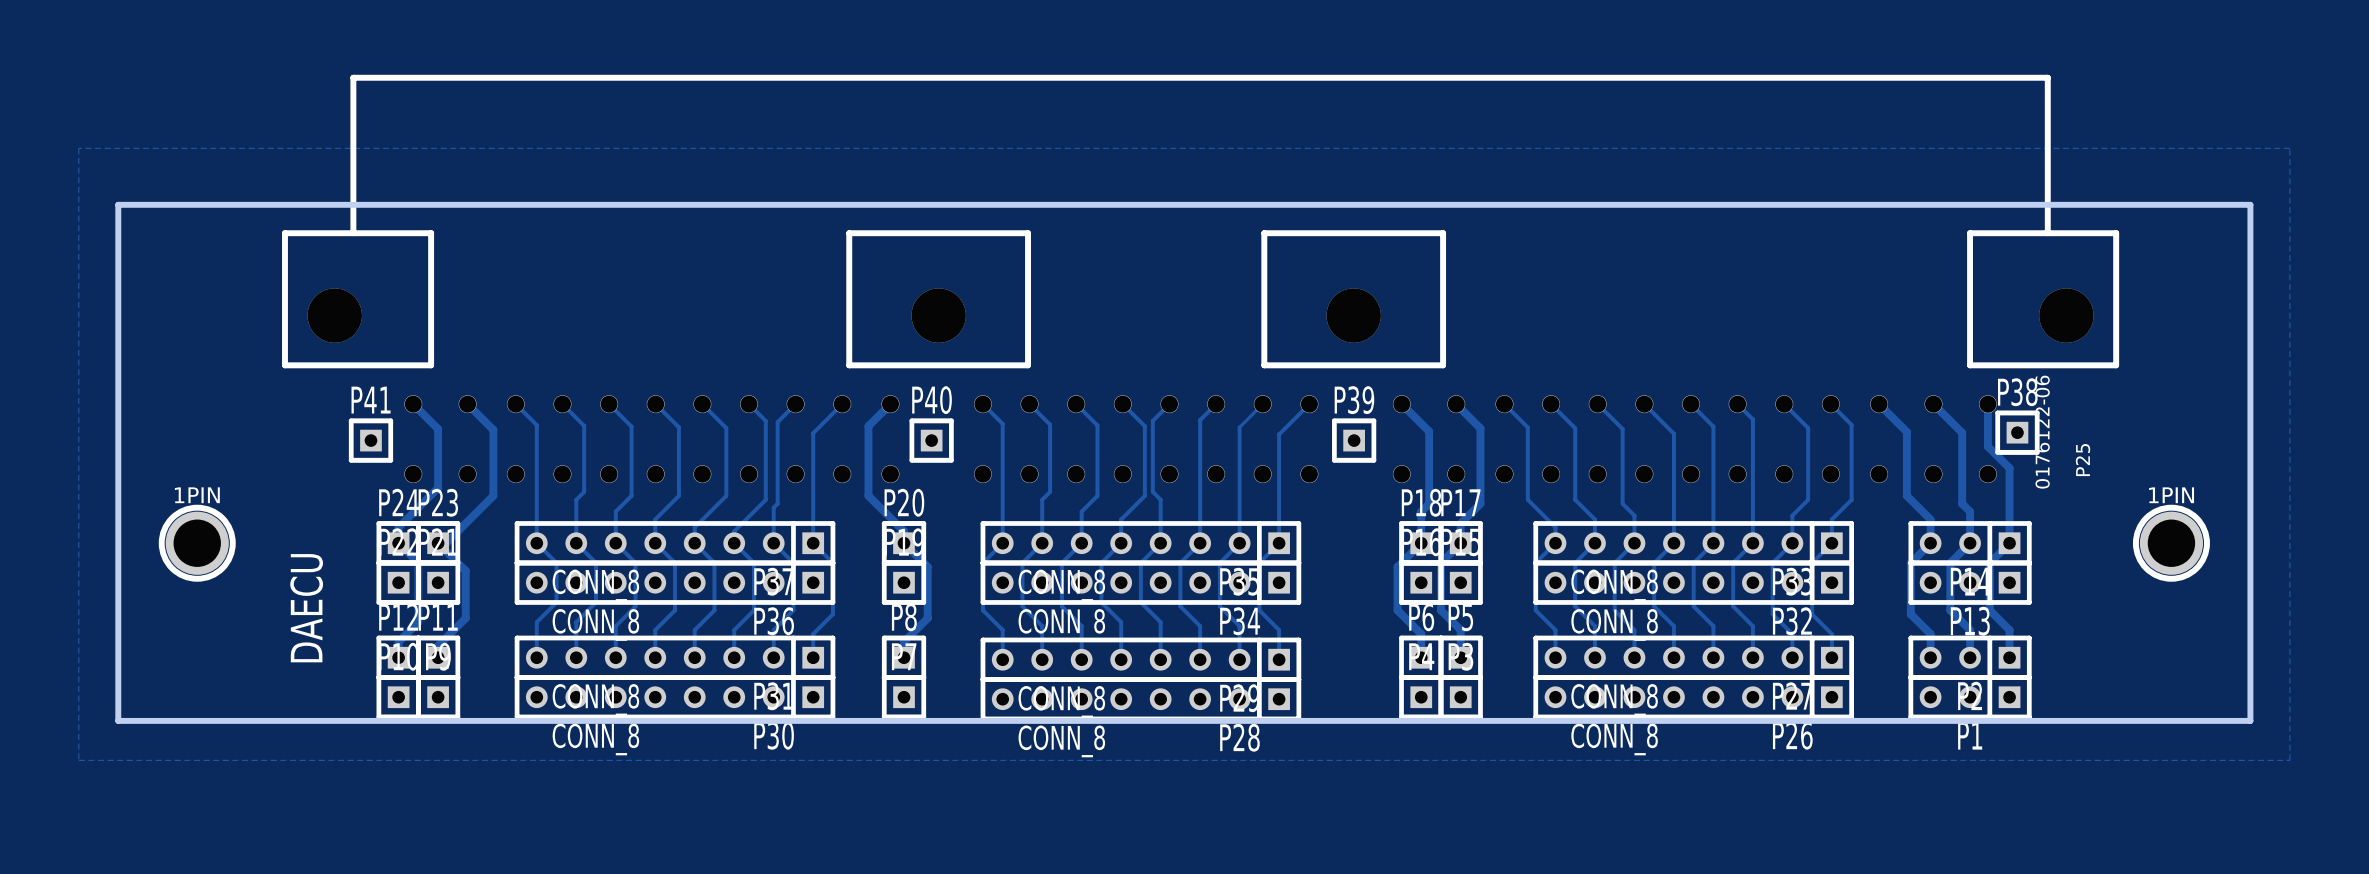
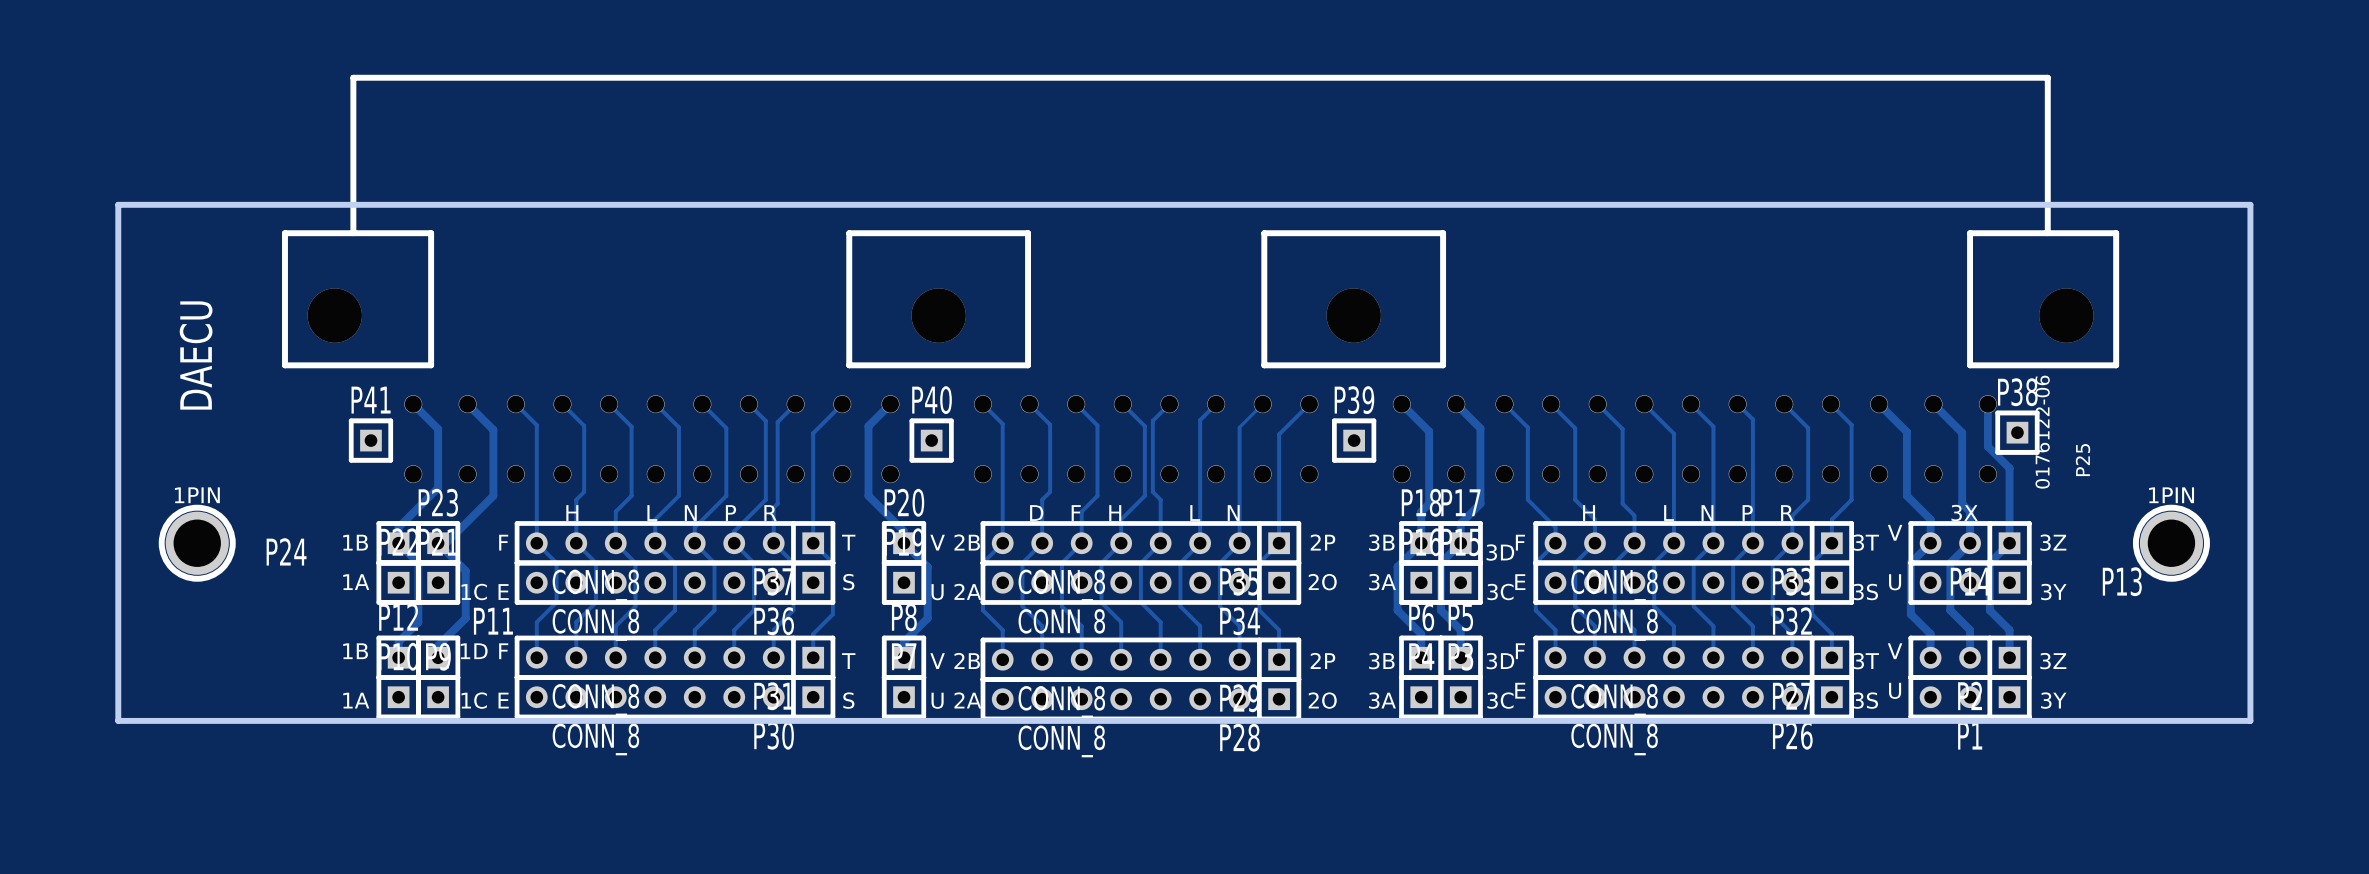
zone outline: (78, 148) (2289, 148) (2289, 760) (78, 760) (78, 148) -> none
P24 name position: P24 (399, 502) -> P24 (286, 551)
text: none -> H (572, 513)
text: none -> L (652, 513)
text: none -> N (690, 513)
text: none -> P (730, 513)
text: none -> R (770, 513)
text: none -> D (1036, 513)
text: none -> F (1076, 513)
text: none -> H (1115, 513)
text: none -> L (1195, 513)
text: none -> N (1233, 513)
text: none -> H (1589, 513)
text: none -> L (1669, 513)
text: none -> N (1707, 513)
text: none -> P (1747, 513)
text: none -> R (1787, 513)
text: none -> 3X (1964, 513)
text: none -> V (1895, 532)
text: none -> 1B (355, 542)
text: none -> F (503, 542)
text: none -> T (848, 542)
text: none -> V (937, 542)
text: none -> 2B (967, 542)
text: none -> 2P (1322, 542)
text: none -> 3B (1381, 542)
text: none -> F (1520, 542)
text: none -> 3T (1866, 542)
text: none -> 3Z (2053, 542)
text: none -> 3D (1500, 552)
text: none -> 1A (356, 582)
text: none -> S (848, 582)
text: none -> 2O (1322, 582)
text: none -> 3A (1382, 582)
text: none -> E (1520, 582)
text: none -> U (1895, 582)
text: none -> 2A (967, 591)
text: none -> 1C (474, 592)
text: none -> E (503, 592)
text: none -> U (937, 592)
text: none -> 3C (1500, 592)
text: none -> 3S (1865, 592)
text: none -> 3Y (2053, 592)
text position: DAECU (306, 608) -> DAECU (196, 355)
P11 name position: P11 (438, 617) -> P11 (493, 621)
P13 name position: P13 (1970, 621) -> P13 (2122, 581)
text: none -> 1B (355, 651)
text: none -> 1D (474, 651)
text: none -> F (503, 651)
text: none -> F (1520, 651)
text: none -> V (1895, 651)
text: none -> 2B (967, 660)
text: none -> 2P (1322, 660)
text: none -> T (848, 661)
text: none -> V (937, 661)
text: none -> 3B (1381, 661)
text: none -> 3D (1500, 661)
text: none -> 3T (1866, 661)
text: none -> 3Z (2053, 661)
text: none -> E (1520, 690)
text: none -> U (1895, 690)
text: none -> 1A (356, 700)
text: none -> 1C (474, 700)
text: none -> E (503, 700)
text: none -> S (848, 700)
text: none -> U (937, 700)
text: none -> 2A (967, 700)
text: none -> 2O (1322, 700)
text: none -> 3A (1382, 700)
text: none -> 3C (1500, 700)
text: none -> 3S (1865, 700)
text: none -> 3Y (2053, 700)

